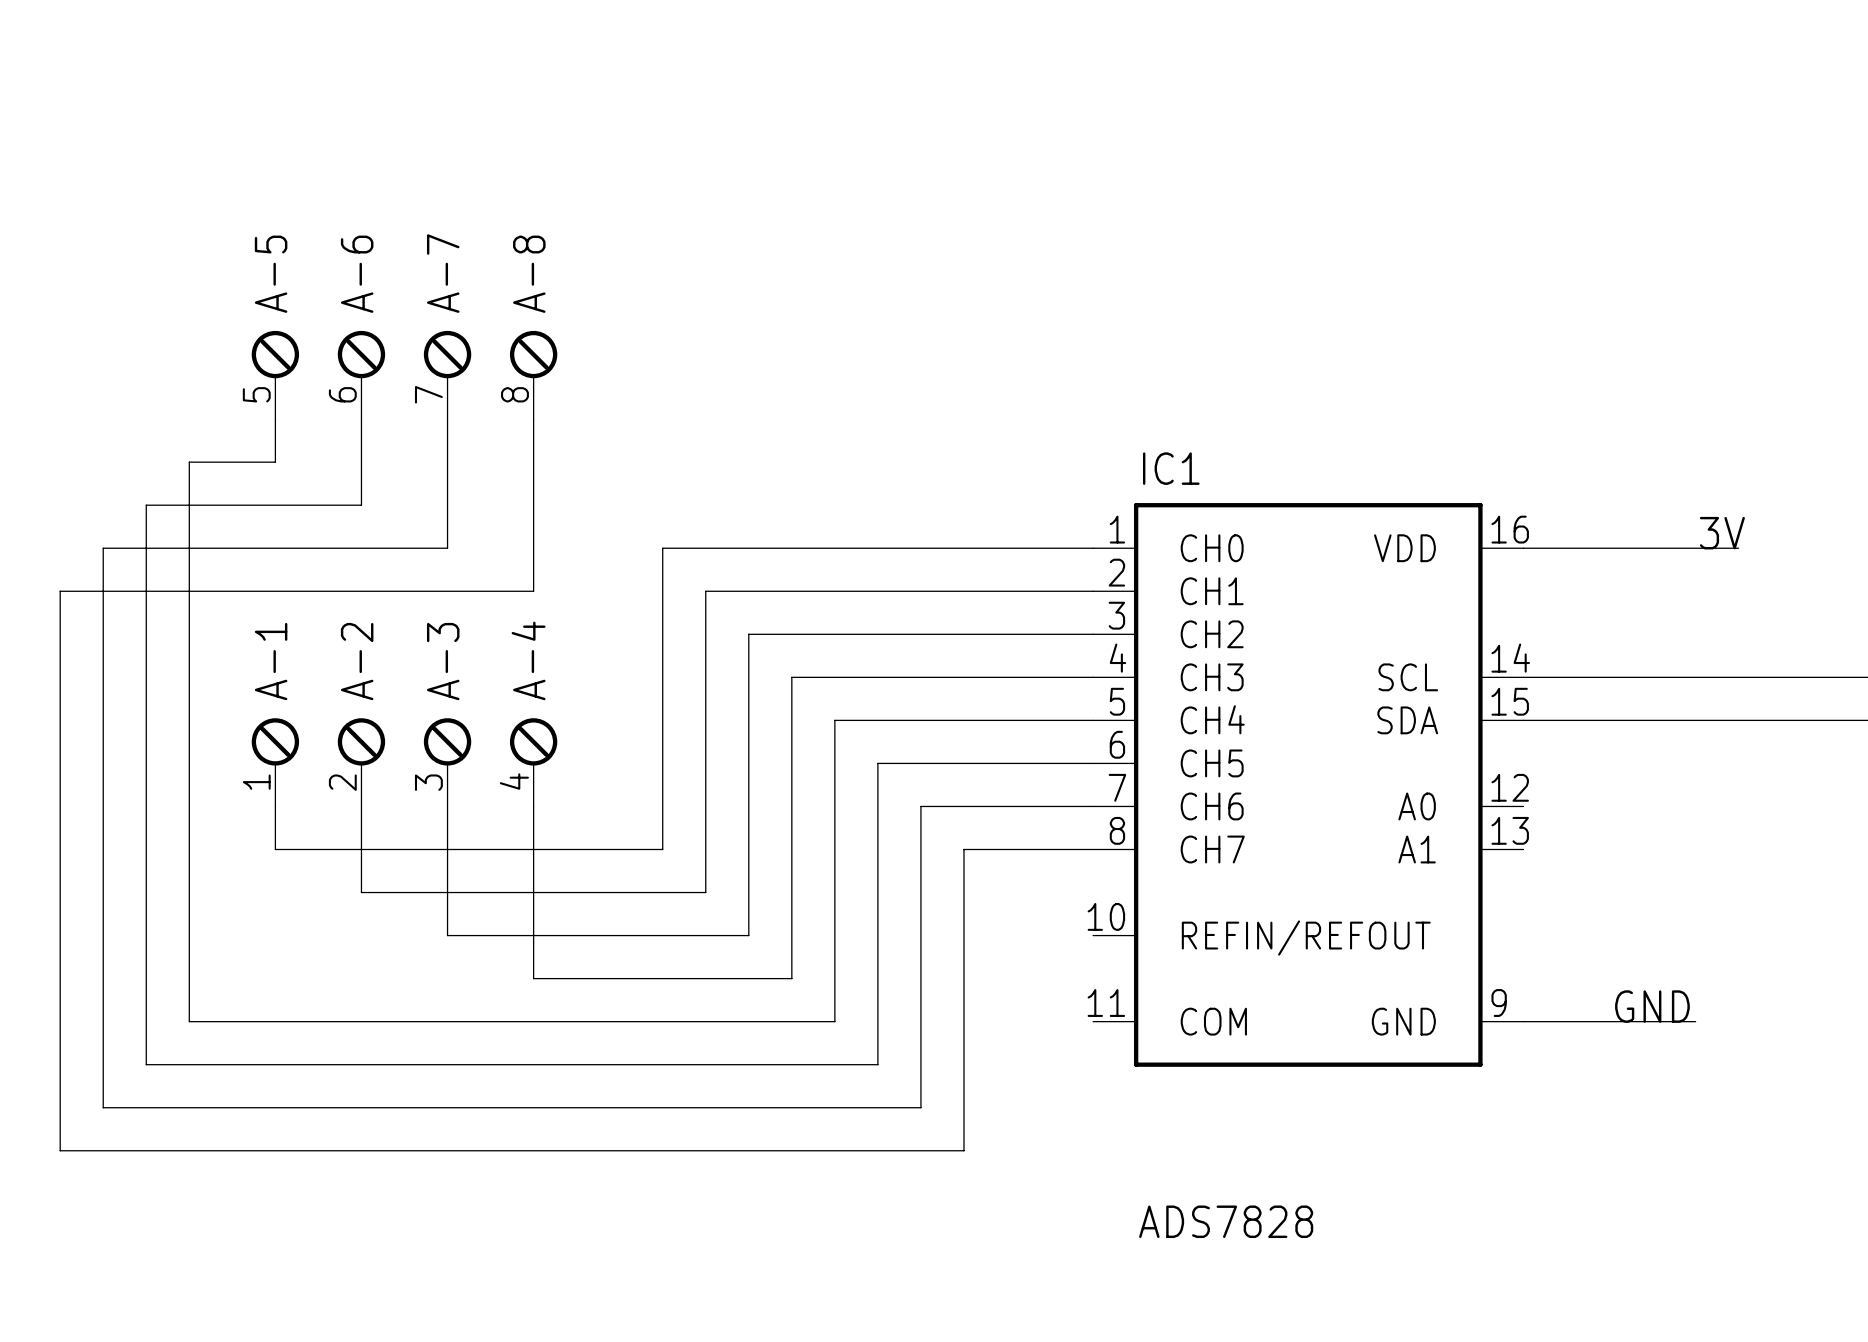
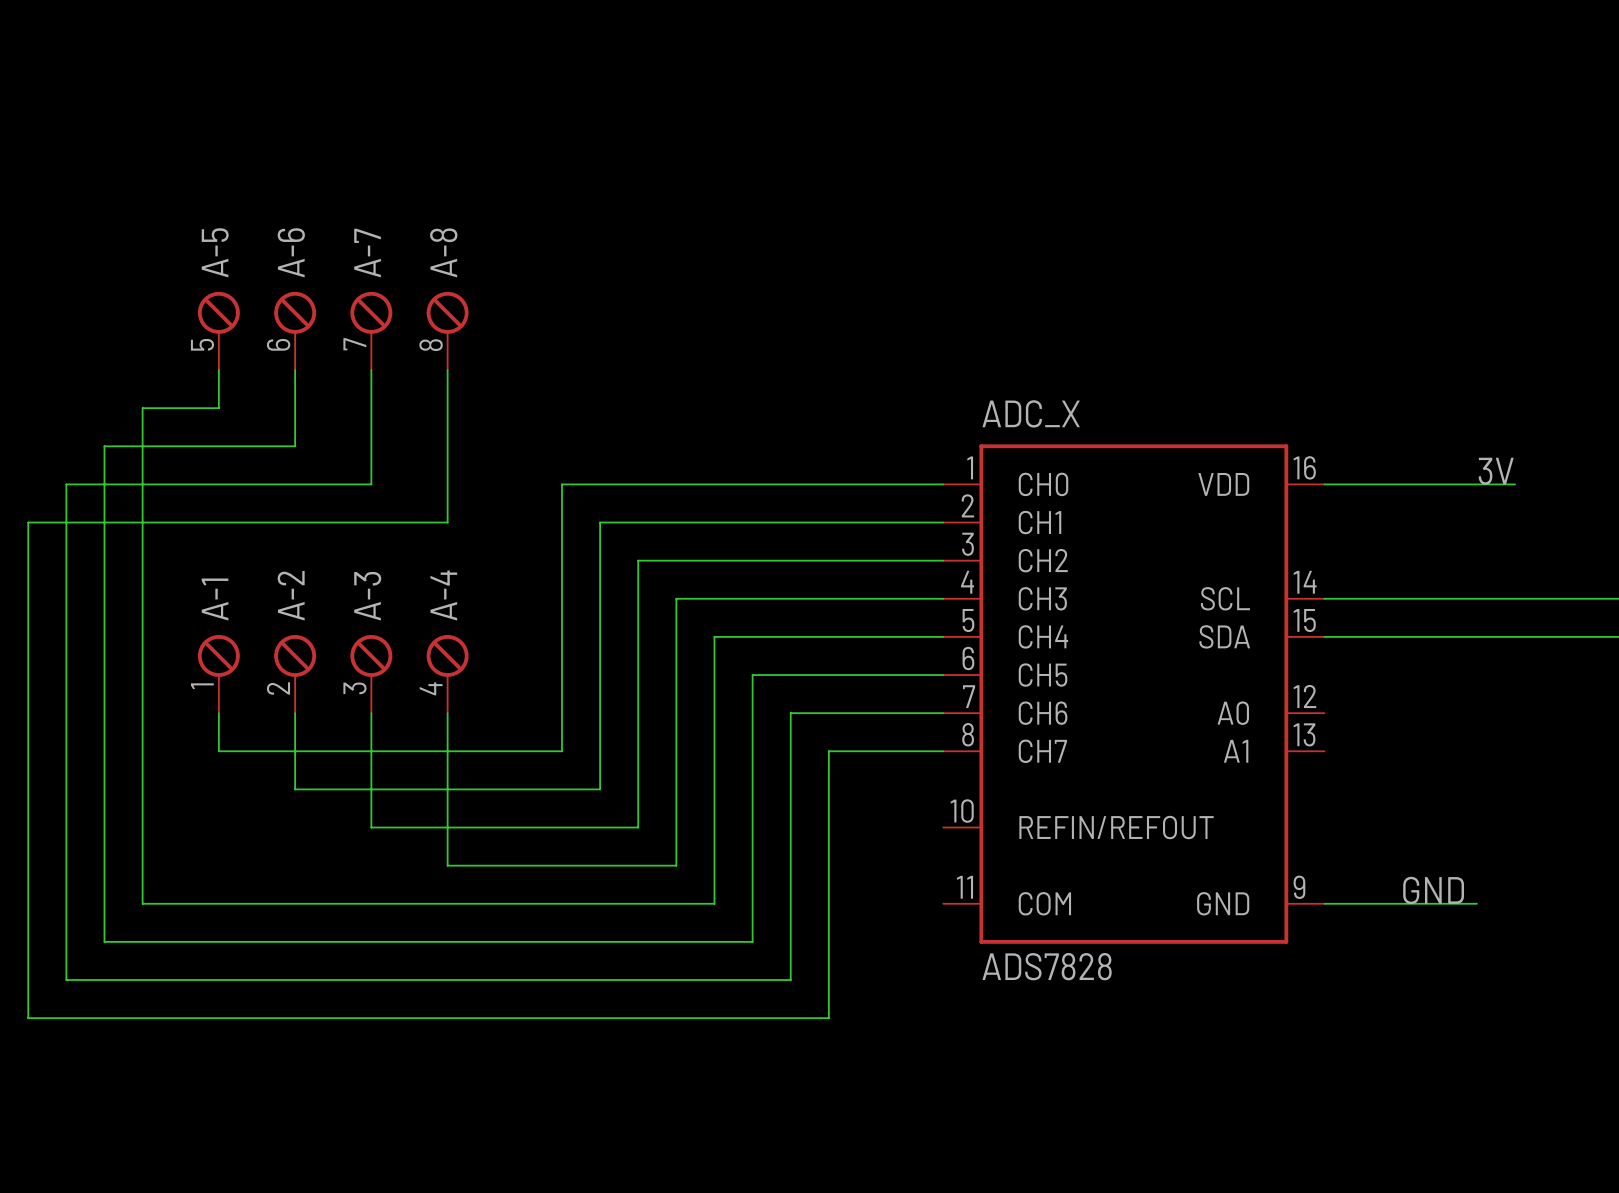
IC1 name: IC1 (1171, 468) -> ADC_X (1031, 413)
IC1 value position: ADS7828 (1226, 1221) -> ADS7828 (1047, 966)

